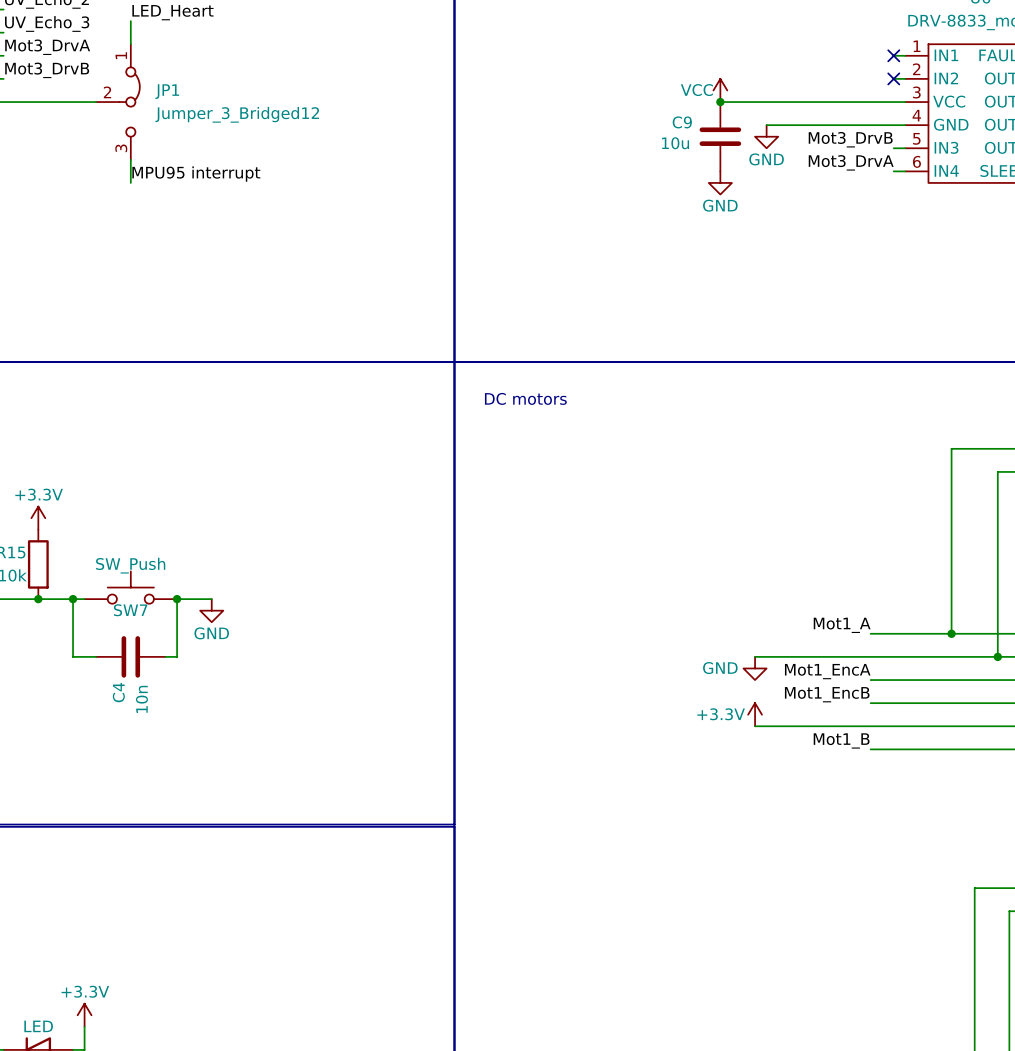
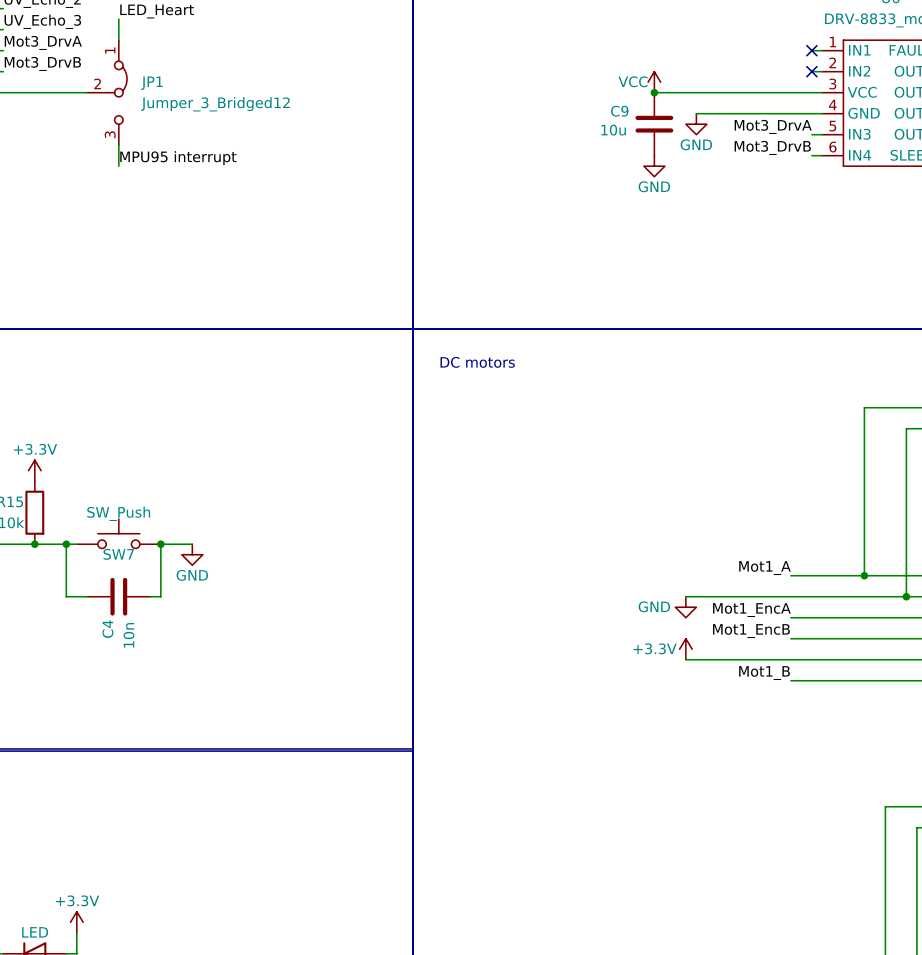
label: Mot3_DrvB (850, 139) -> Mot3_DrvA (773, 126)
label: Mot3_DrvA (851, 162) -> Mot3_DrvB (772, 147)

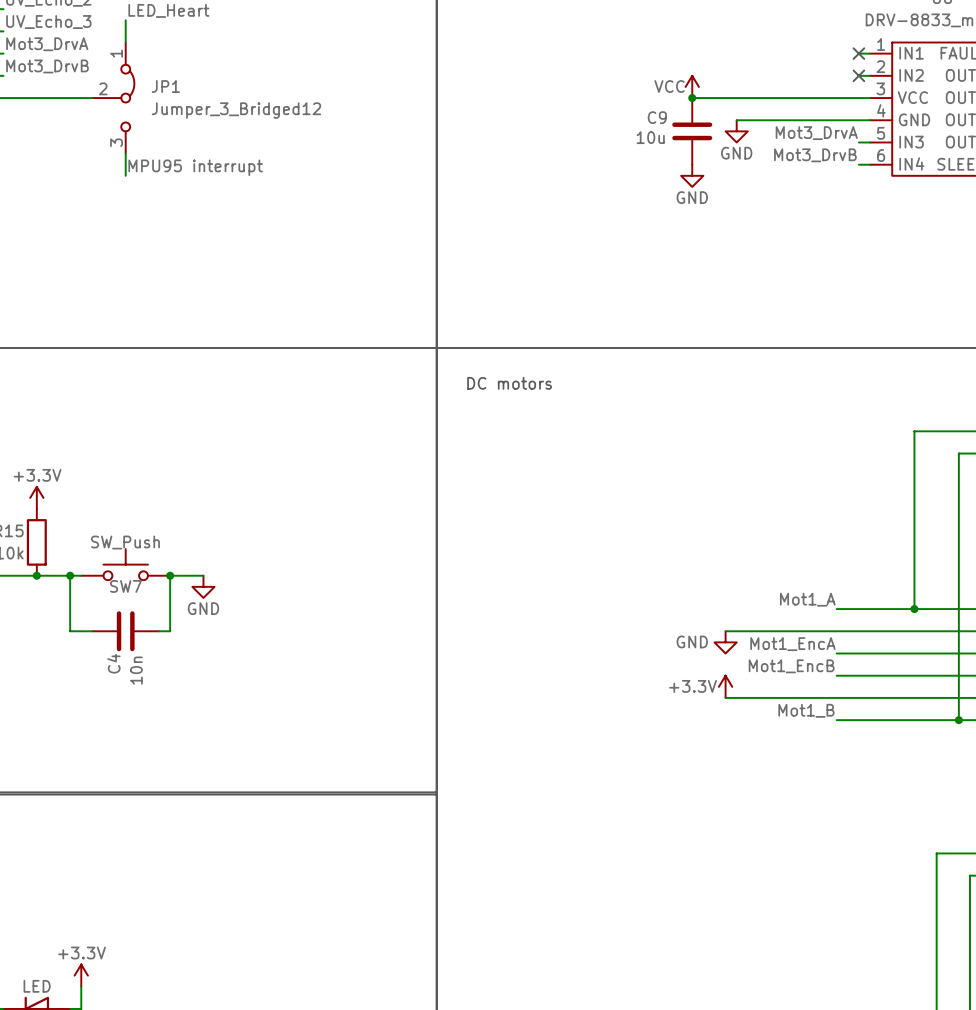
wire: none -> (958, 631) (958, 720)
junction: (906, 596) -> none
junction: none -> (958, 720)

